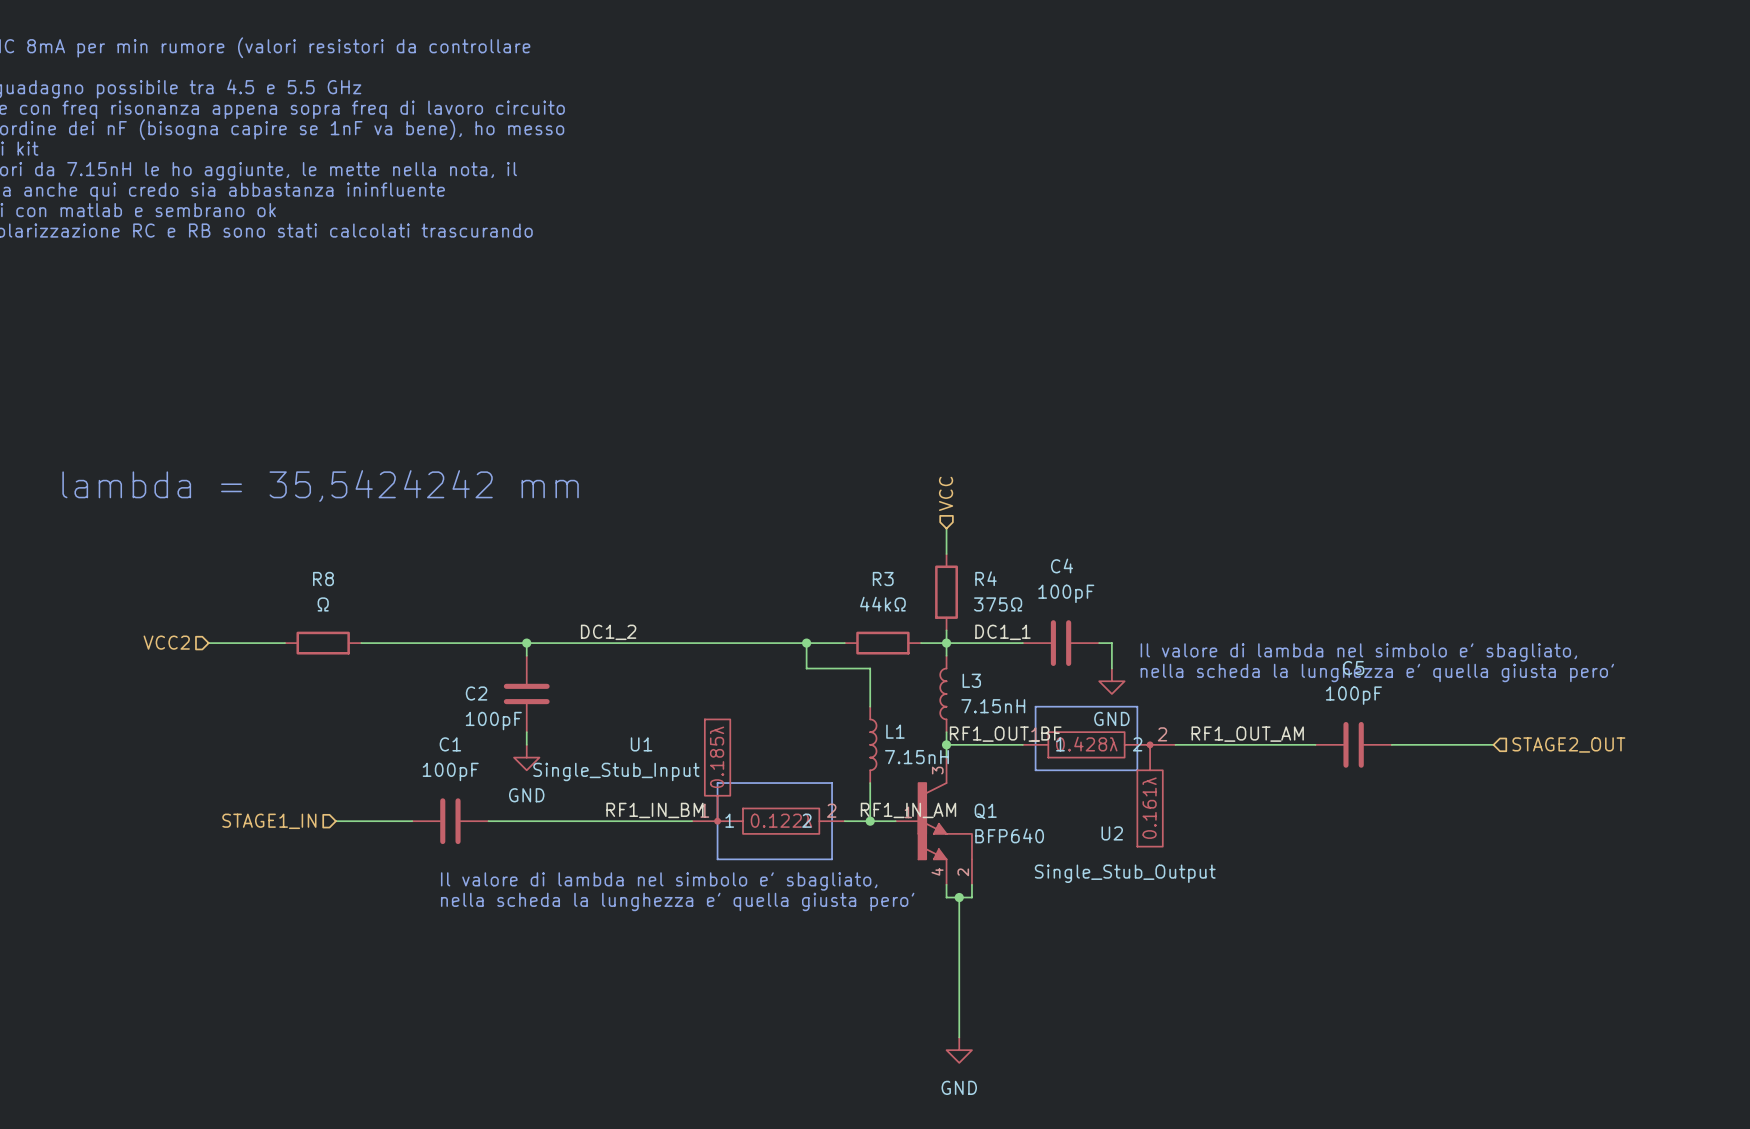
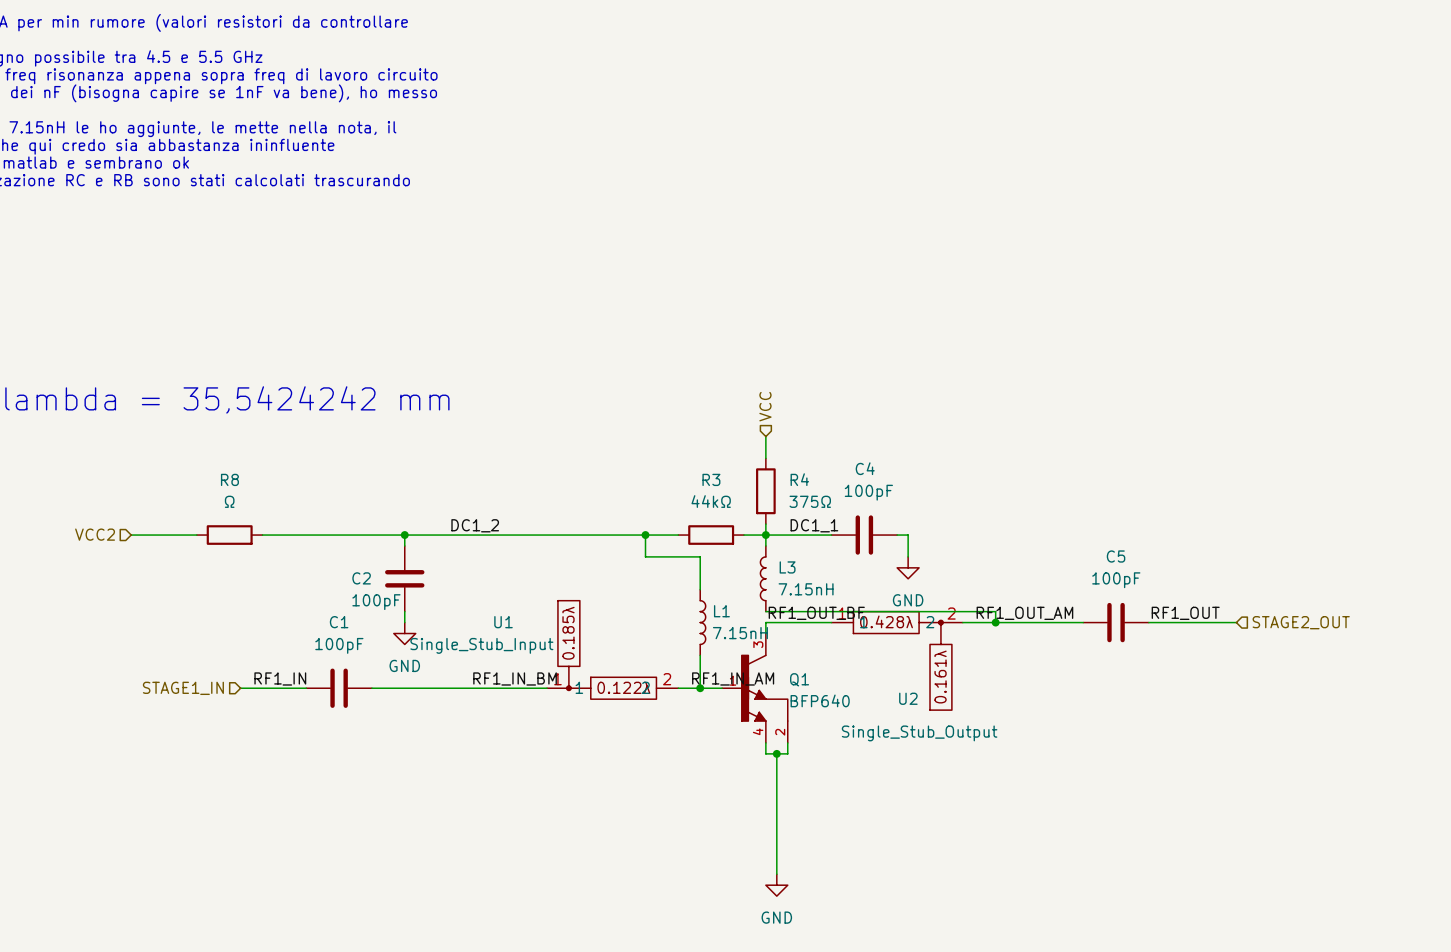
text: Il valore di lambda nel simbolo e' sbagliato, (1358, 652) -> none
text: nella scheda la lunghezza e' quella giusta pero' (1377, 672) -> none
line: (1035, 706) (1137, 706) (1137, 770) (1035, 770) (1035, 706) -> none
wire: (946, 732) (946, 744) -> (765, 611) (995, 611) (995, 622)
label: none -> RF1_OUT (1185, 613)
junction: (946, 744) -> none
junction: none -> (995, 622)
line: (717, 783) (717, 859) (832, 859) (832, 783) (717, 783) -> none
label: none -> RF1_IN (280, 678)
text: Il valore di lambda nel simbolo e' sbagliato, (659, 881) -> none
text: nella scheda la lunghezza e' quella giusta pero' (677, 901) -> none

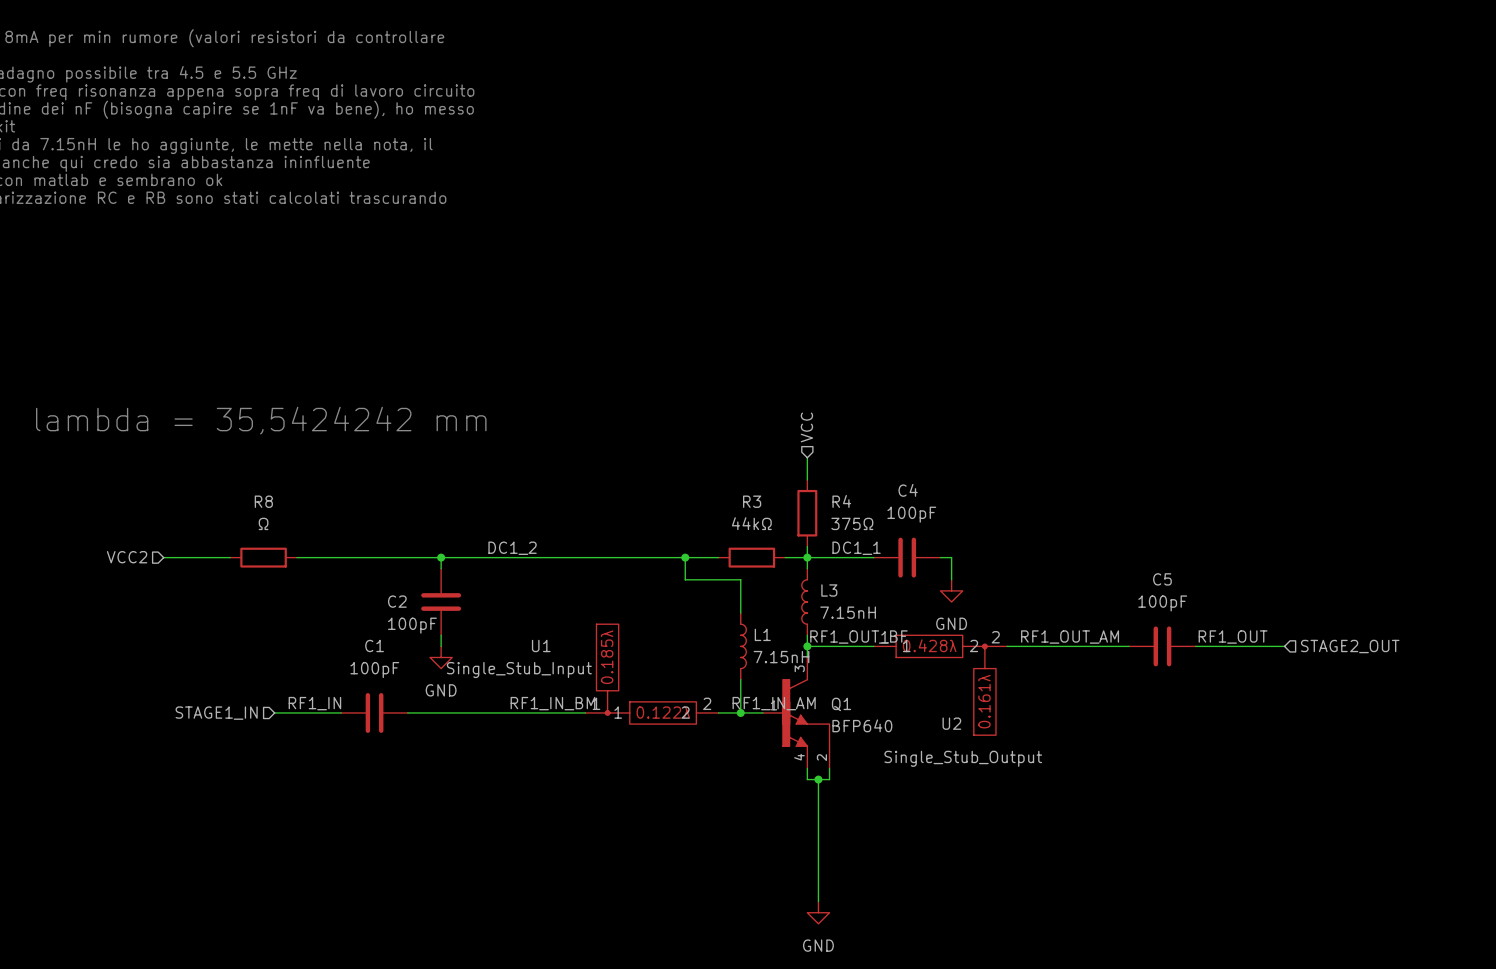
wire: (765, 611) (995, 611) (995, 622) -> (807, 635) (807, 646)
junction: none -> (807, 646)
junction: (995, 622) -> none

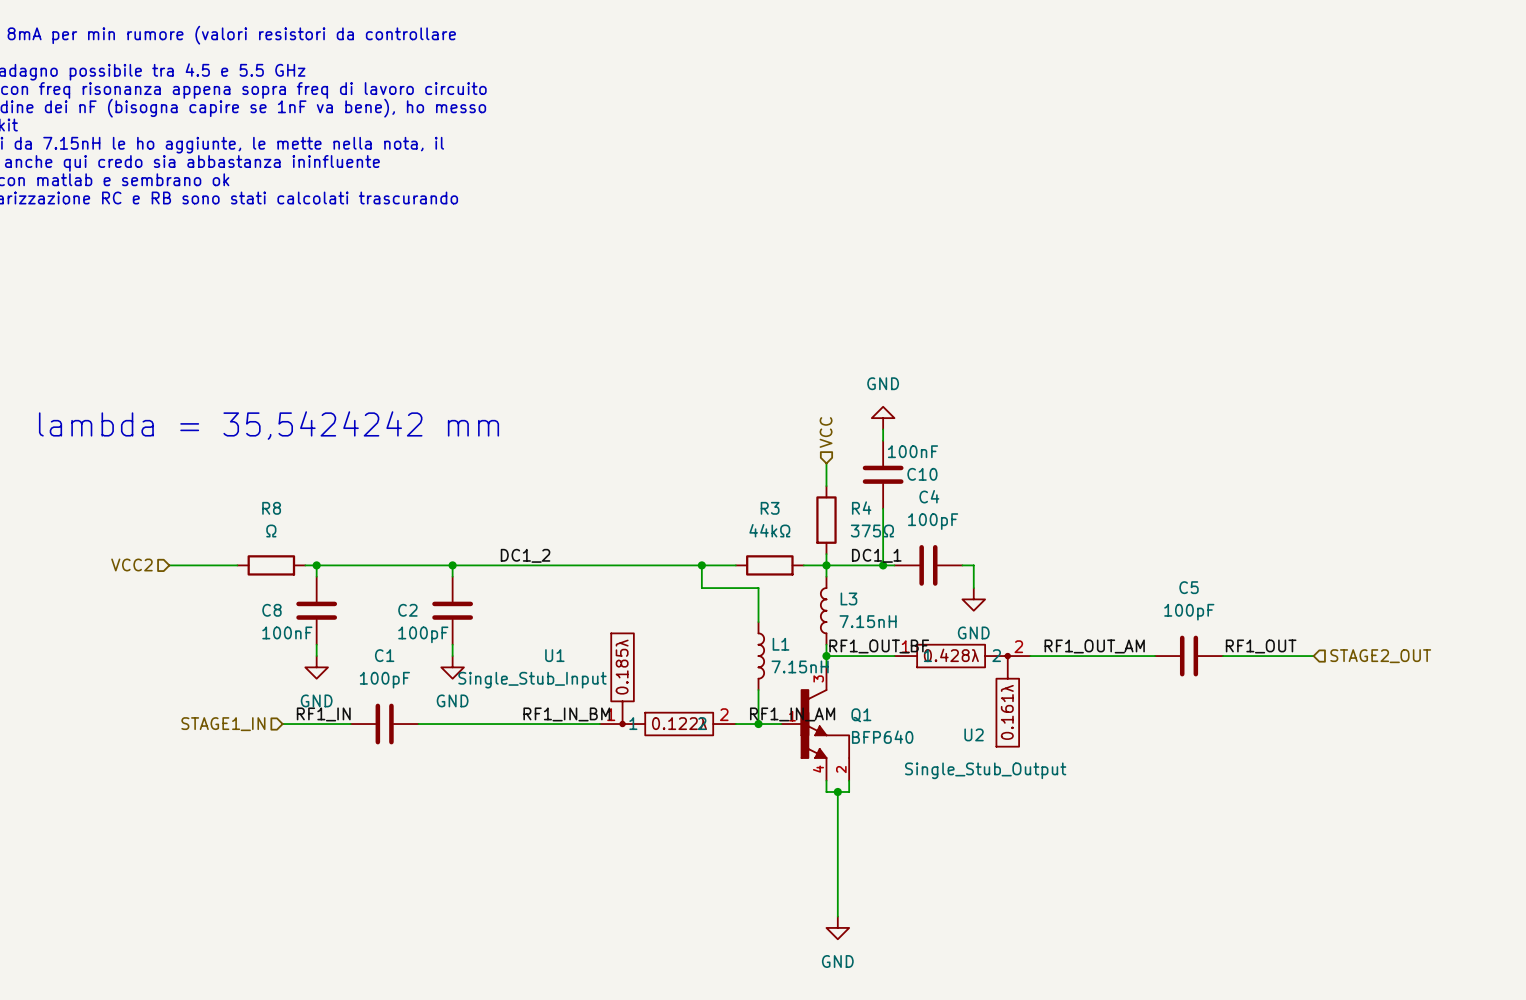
power symbol: none -> GND (883, 418)
wire: none -> (883, 429) (883, 440)
C10: none -> 100nF (883, 474)
wire: none -> (883, 508) (883, 565)
wire: none -> (316, 565) (316, 576)
junction: none -> (316, 565)
junction: none -> (883, 565)
C8: none -> 100nF (316, 610)
wire: none -> (316, 644) (316, 656)
power symbol: none -> GND (316, 667)

